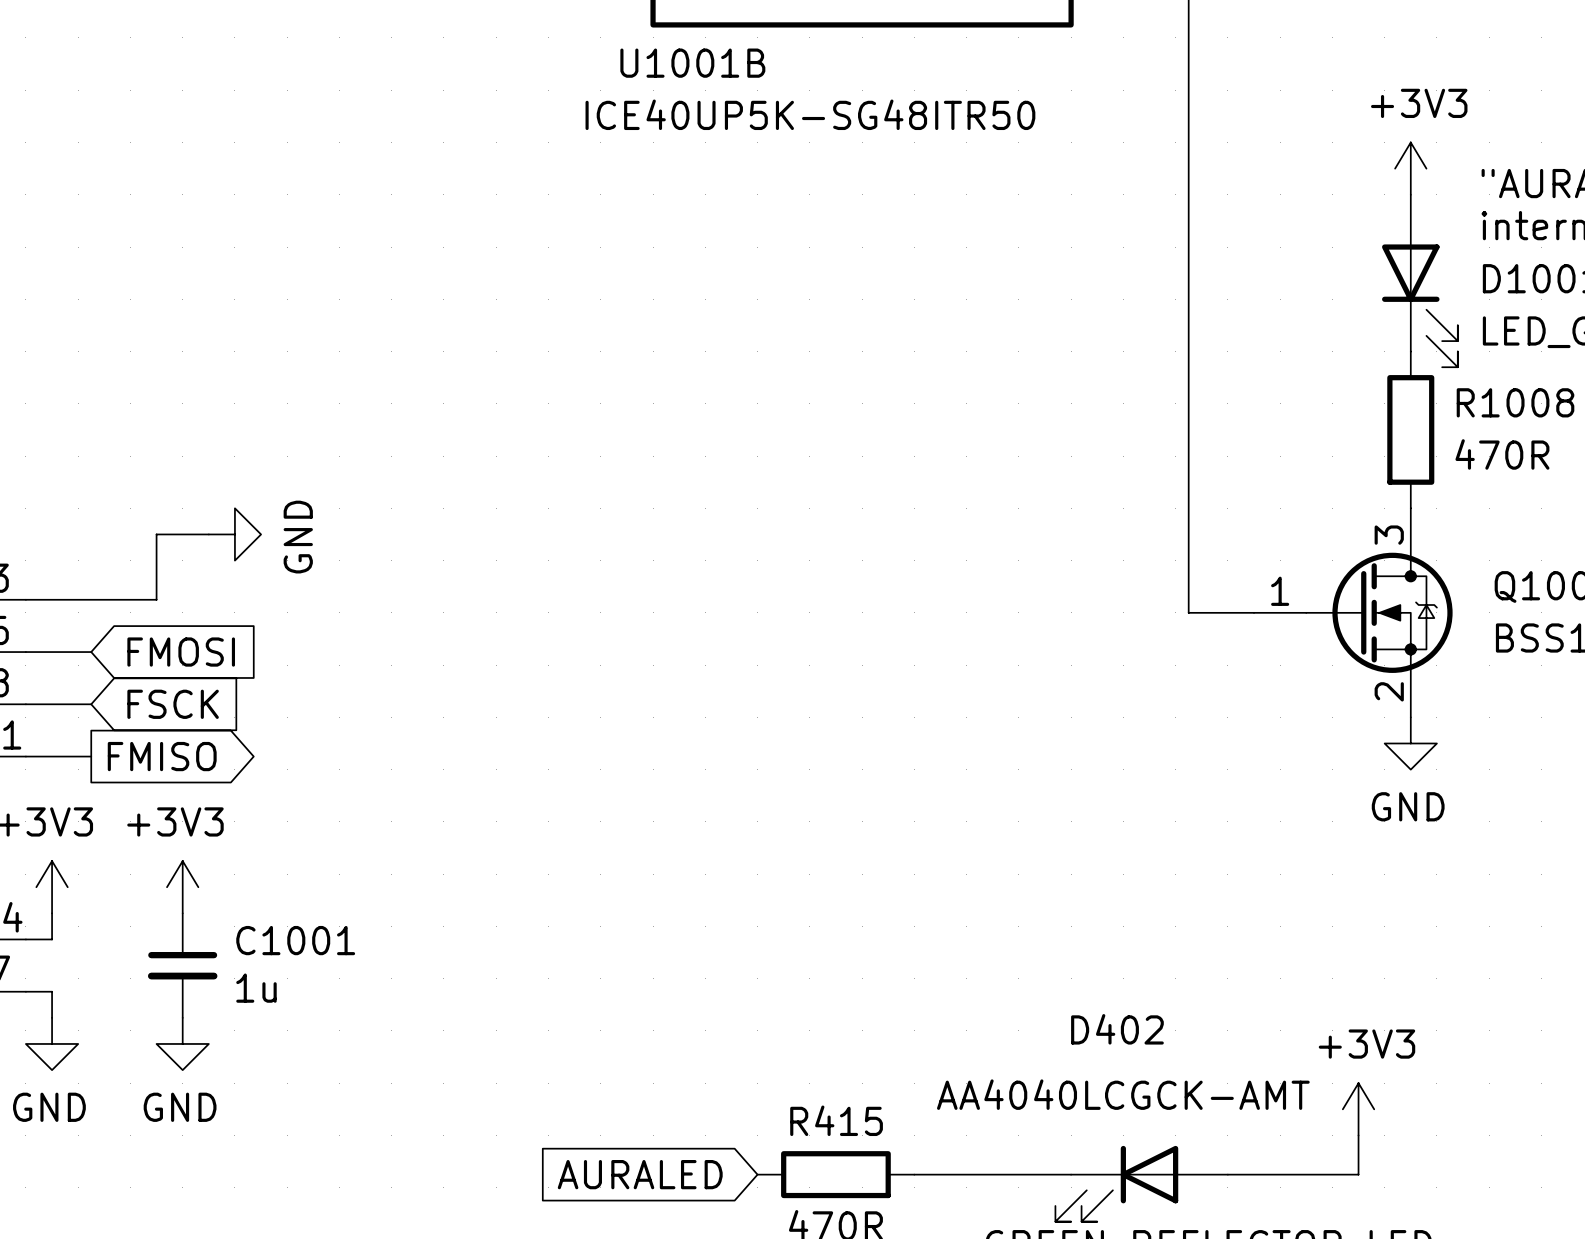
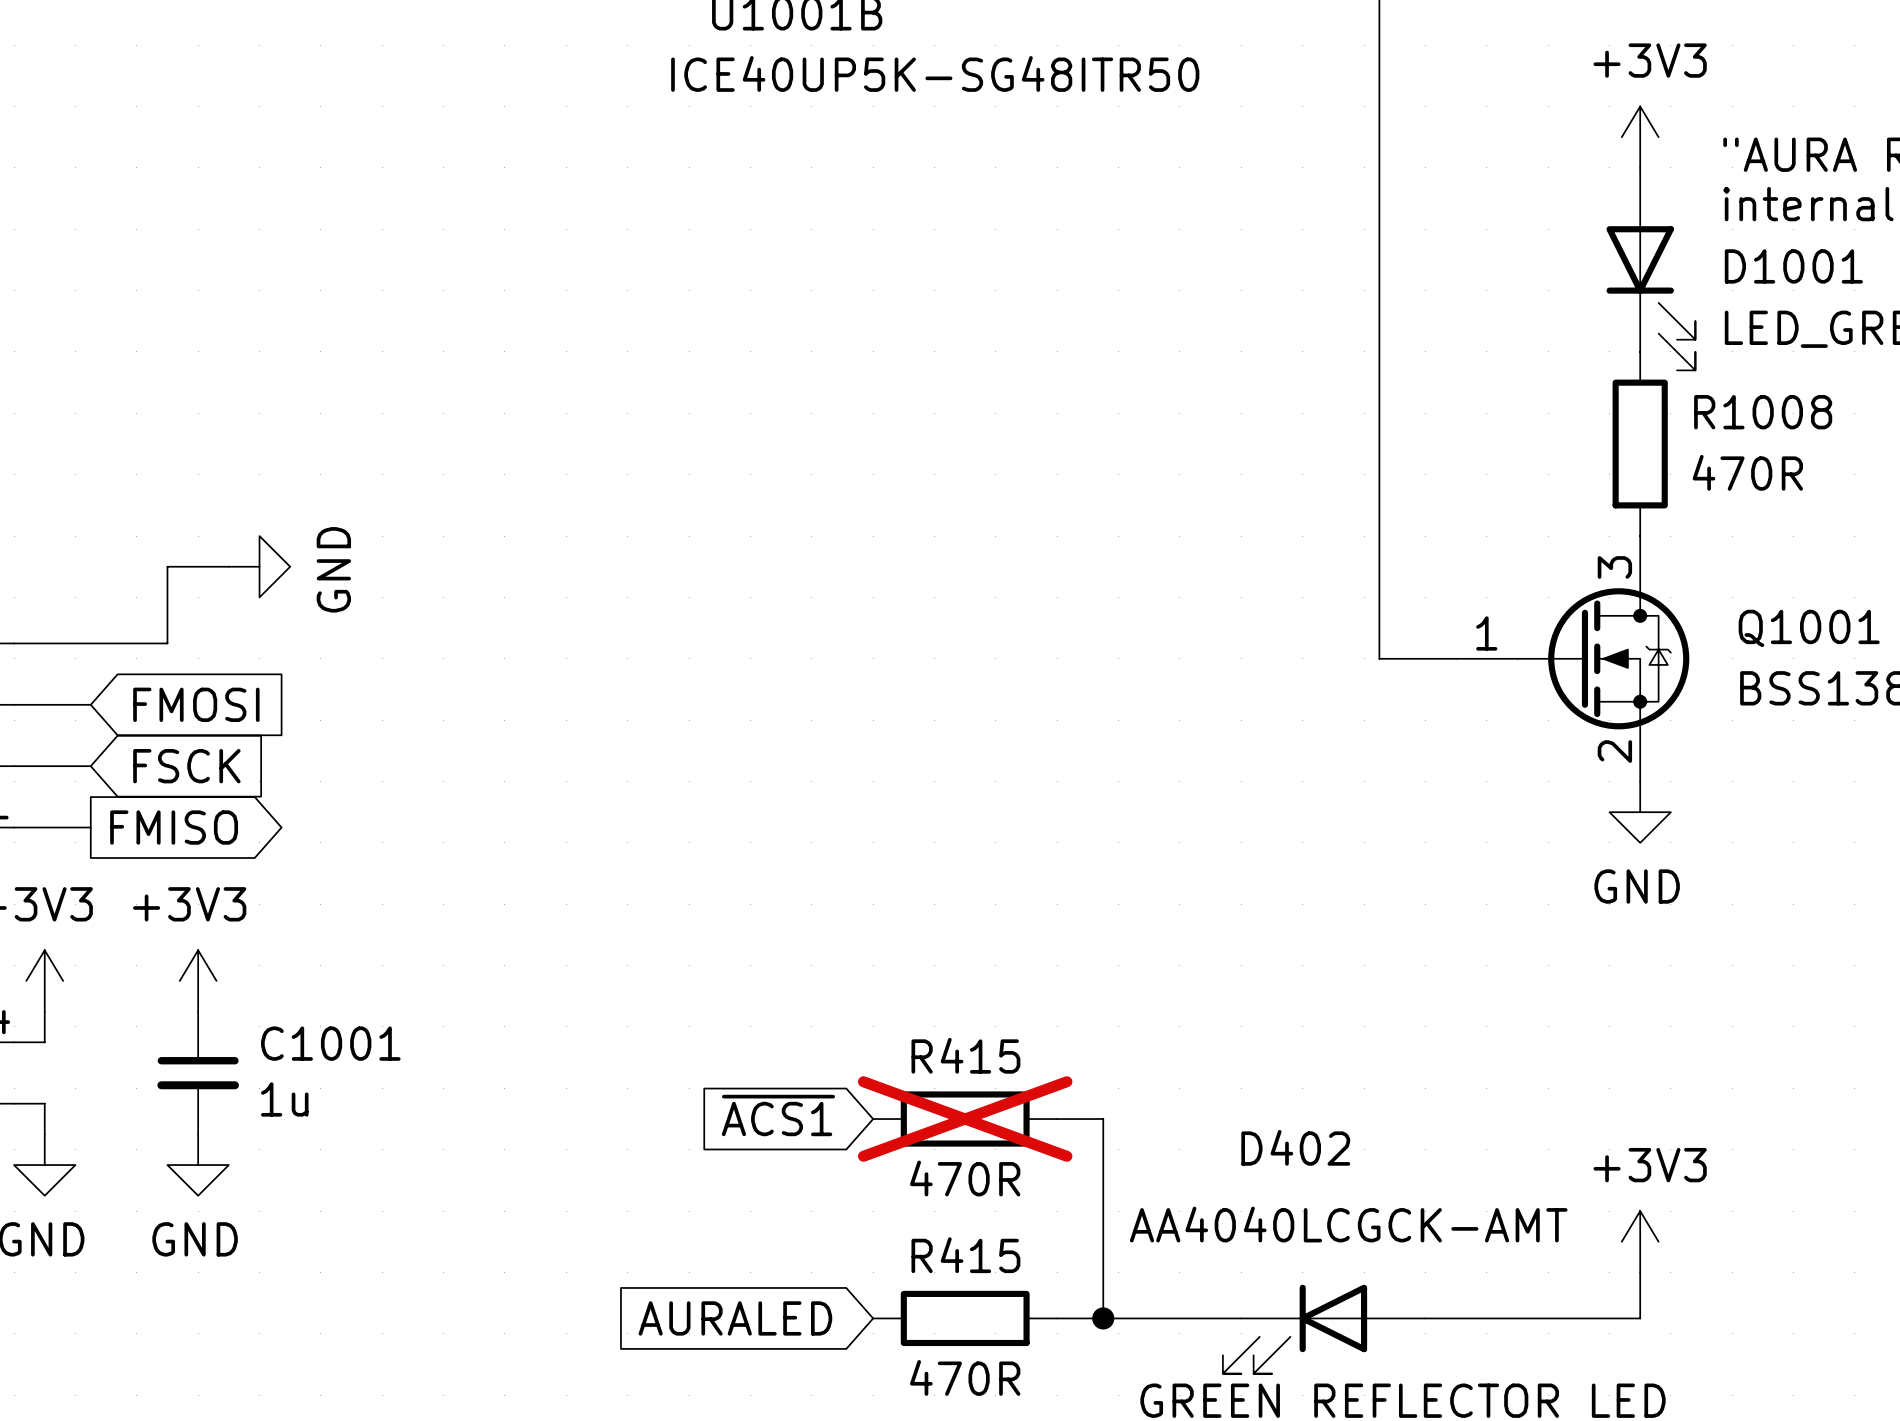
global label: none -> ~{ACS1} (778, 1115)
R415: none -> 470R (965, 1119)
wire: none -> (1057, 1119) (1103, 1119) (1103, 1318)
D402 value position: AA4040LCGCK-AMT (1123, 1094) -> AA4040LCGCK-AMT (1348, 1224)
power symbol position: +3V3 (1358, 1109) -> +3V3 (1640, 1241)
wire: (1358, 1135) (1358, 1174) -> (1640, 1272) (1640, 1318) (1578, 1318)
junction: none -> (1103, 1318)

